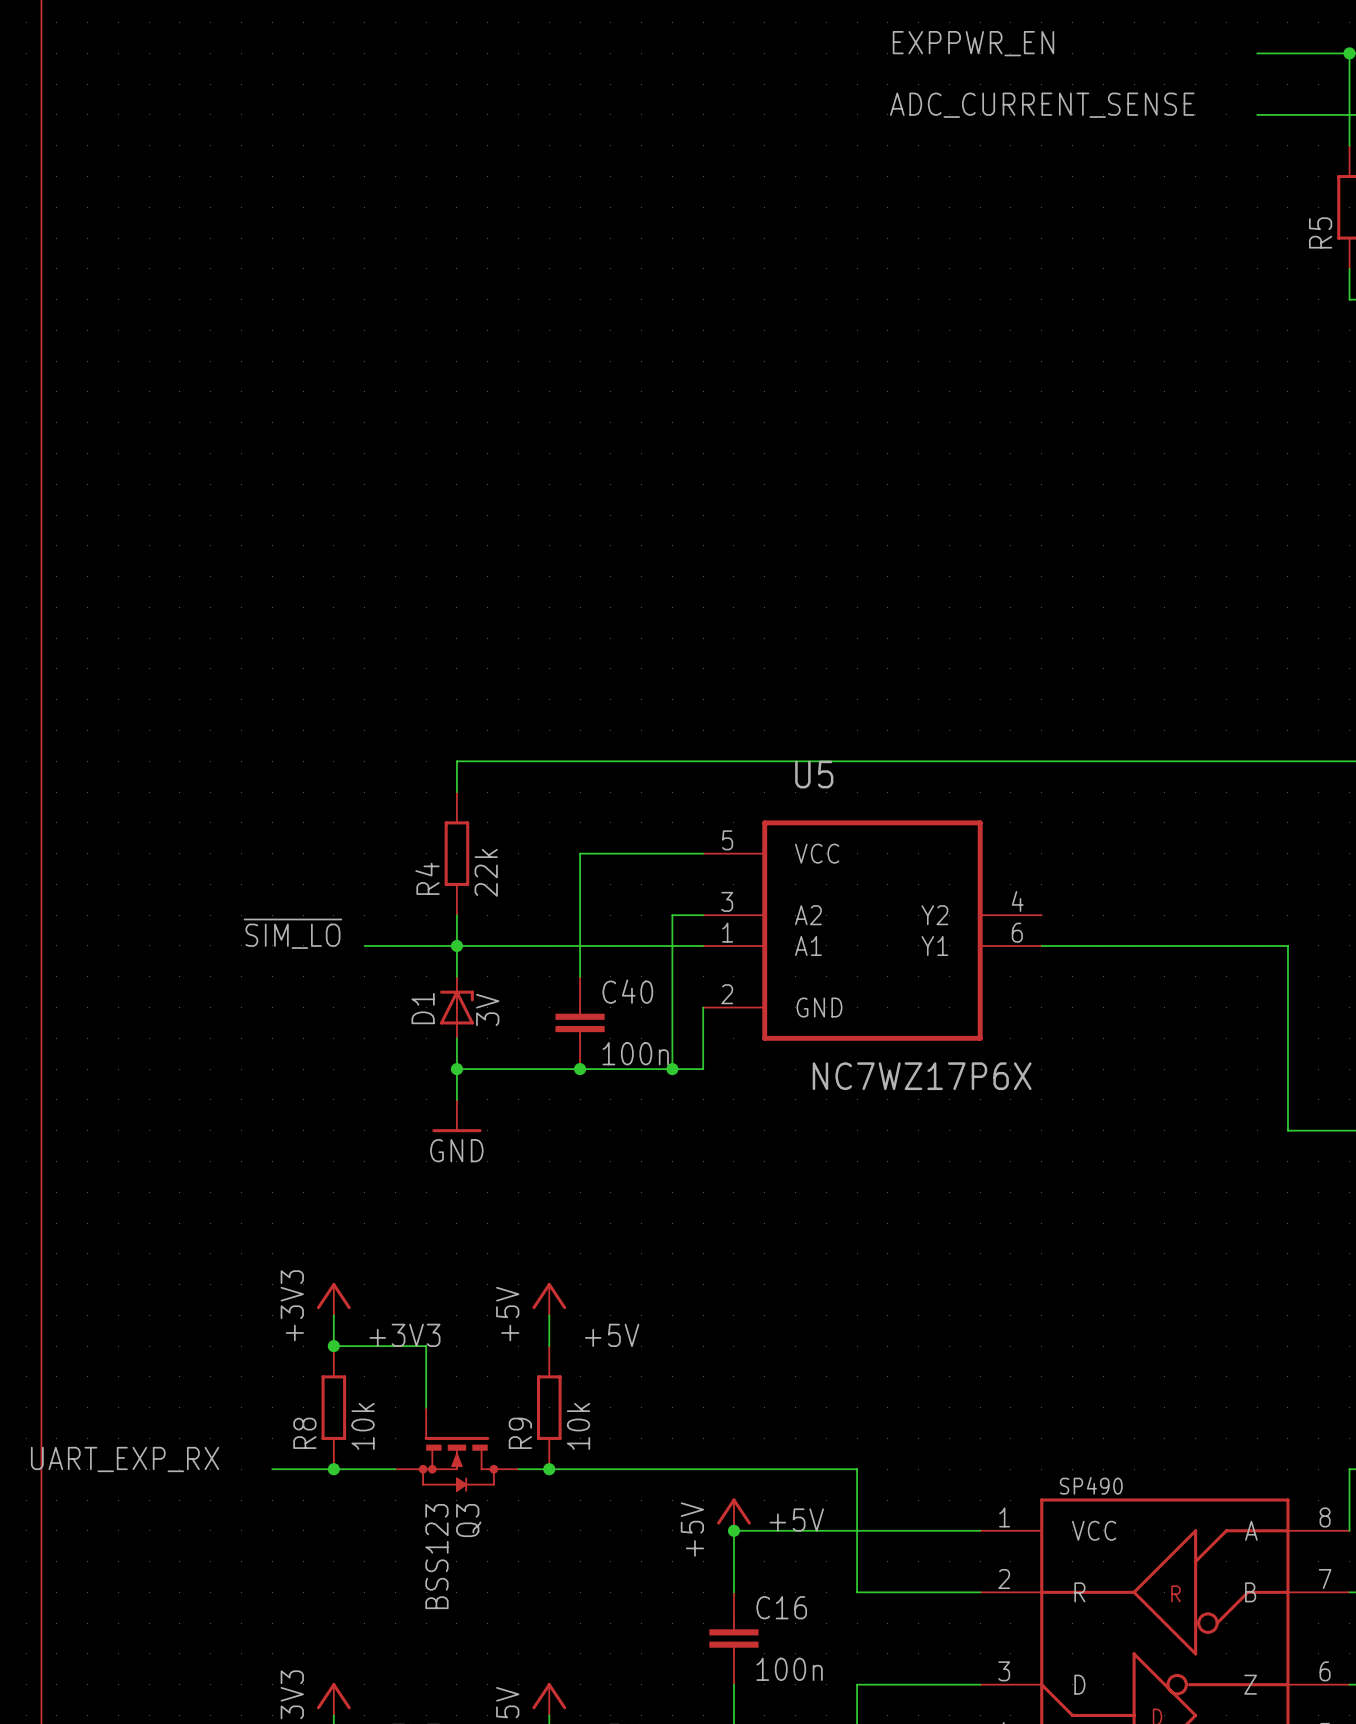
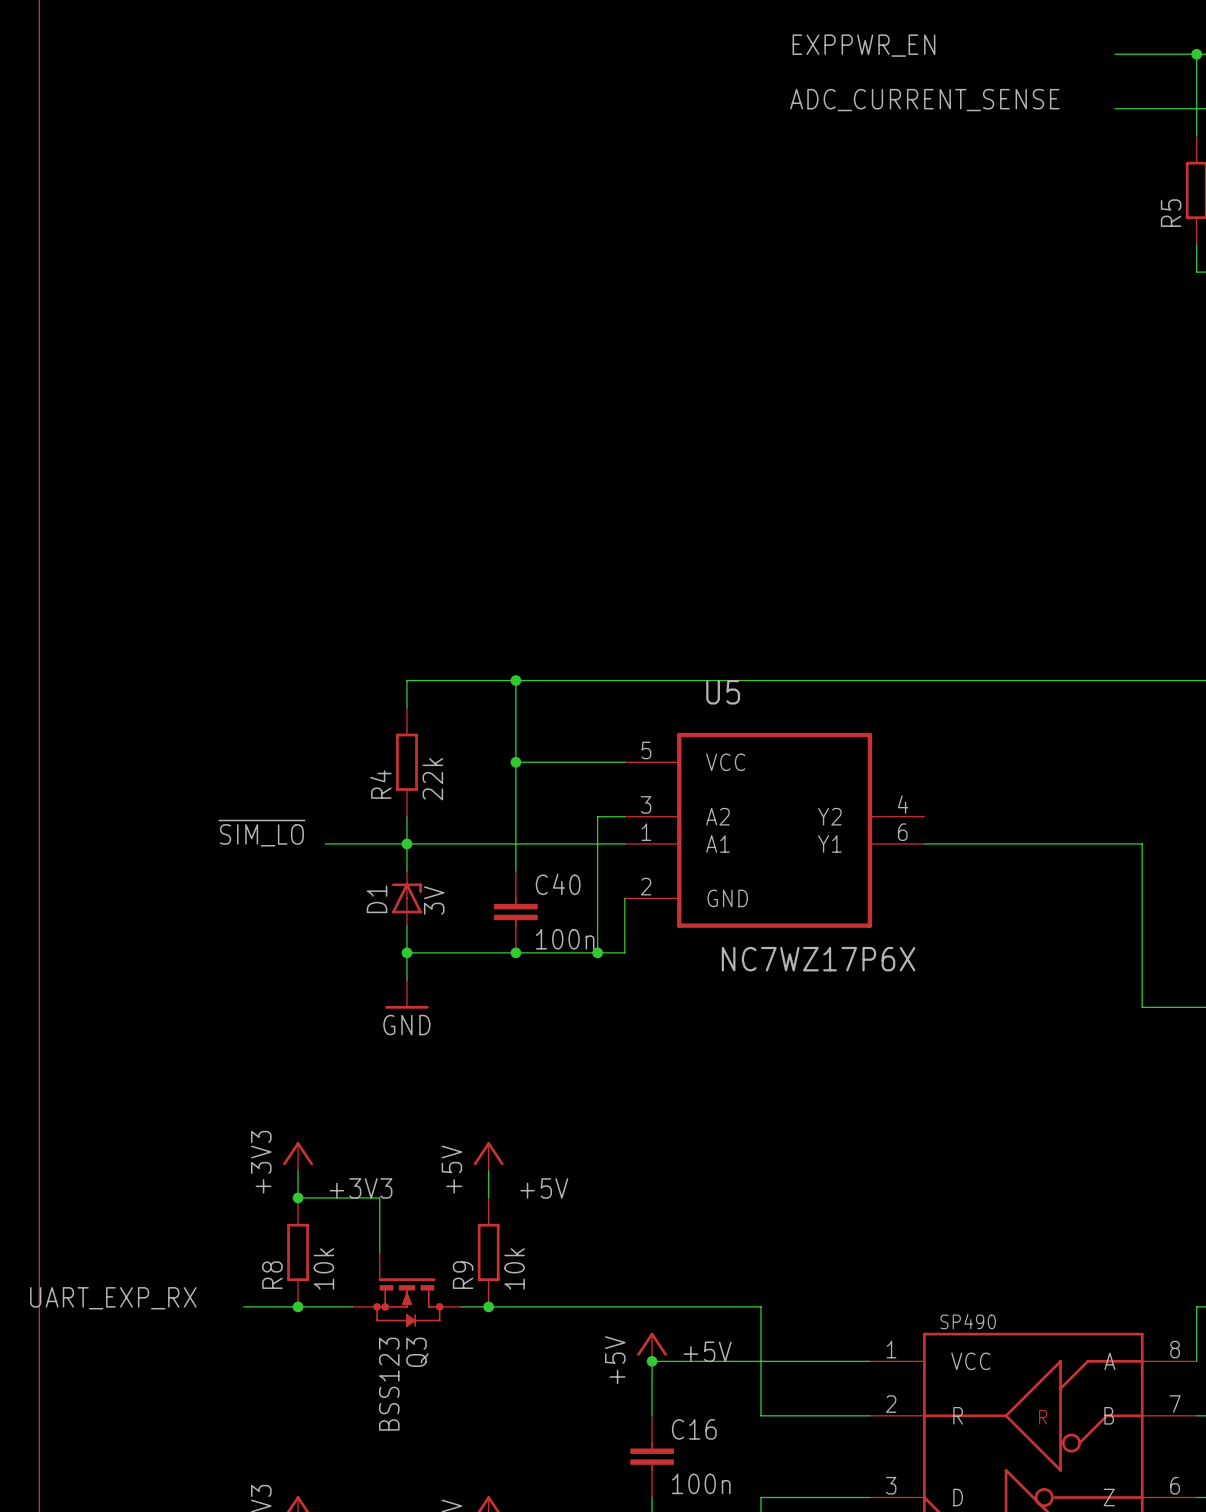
wire: none -> (515, 680) (515, 762)
junction: none -> (515, 680)
junction: none -> (515, 762)

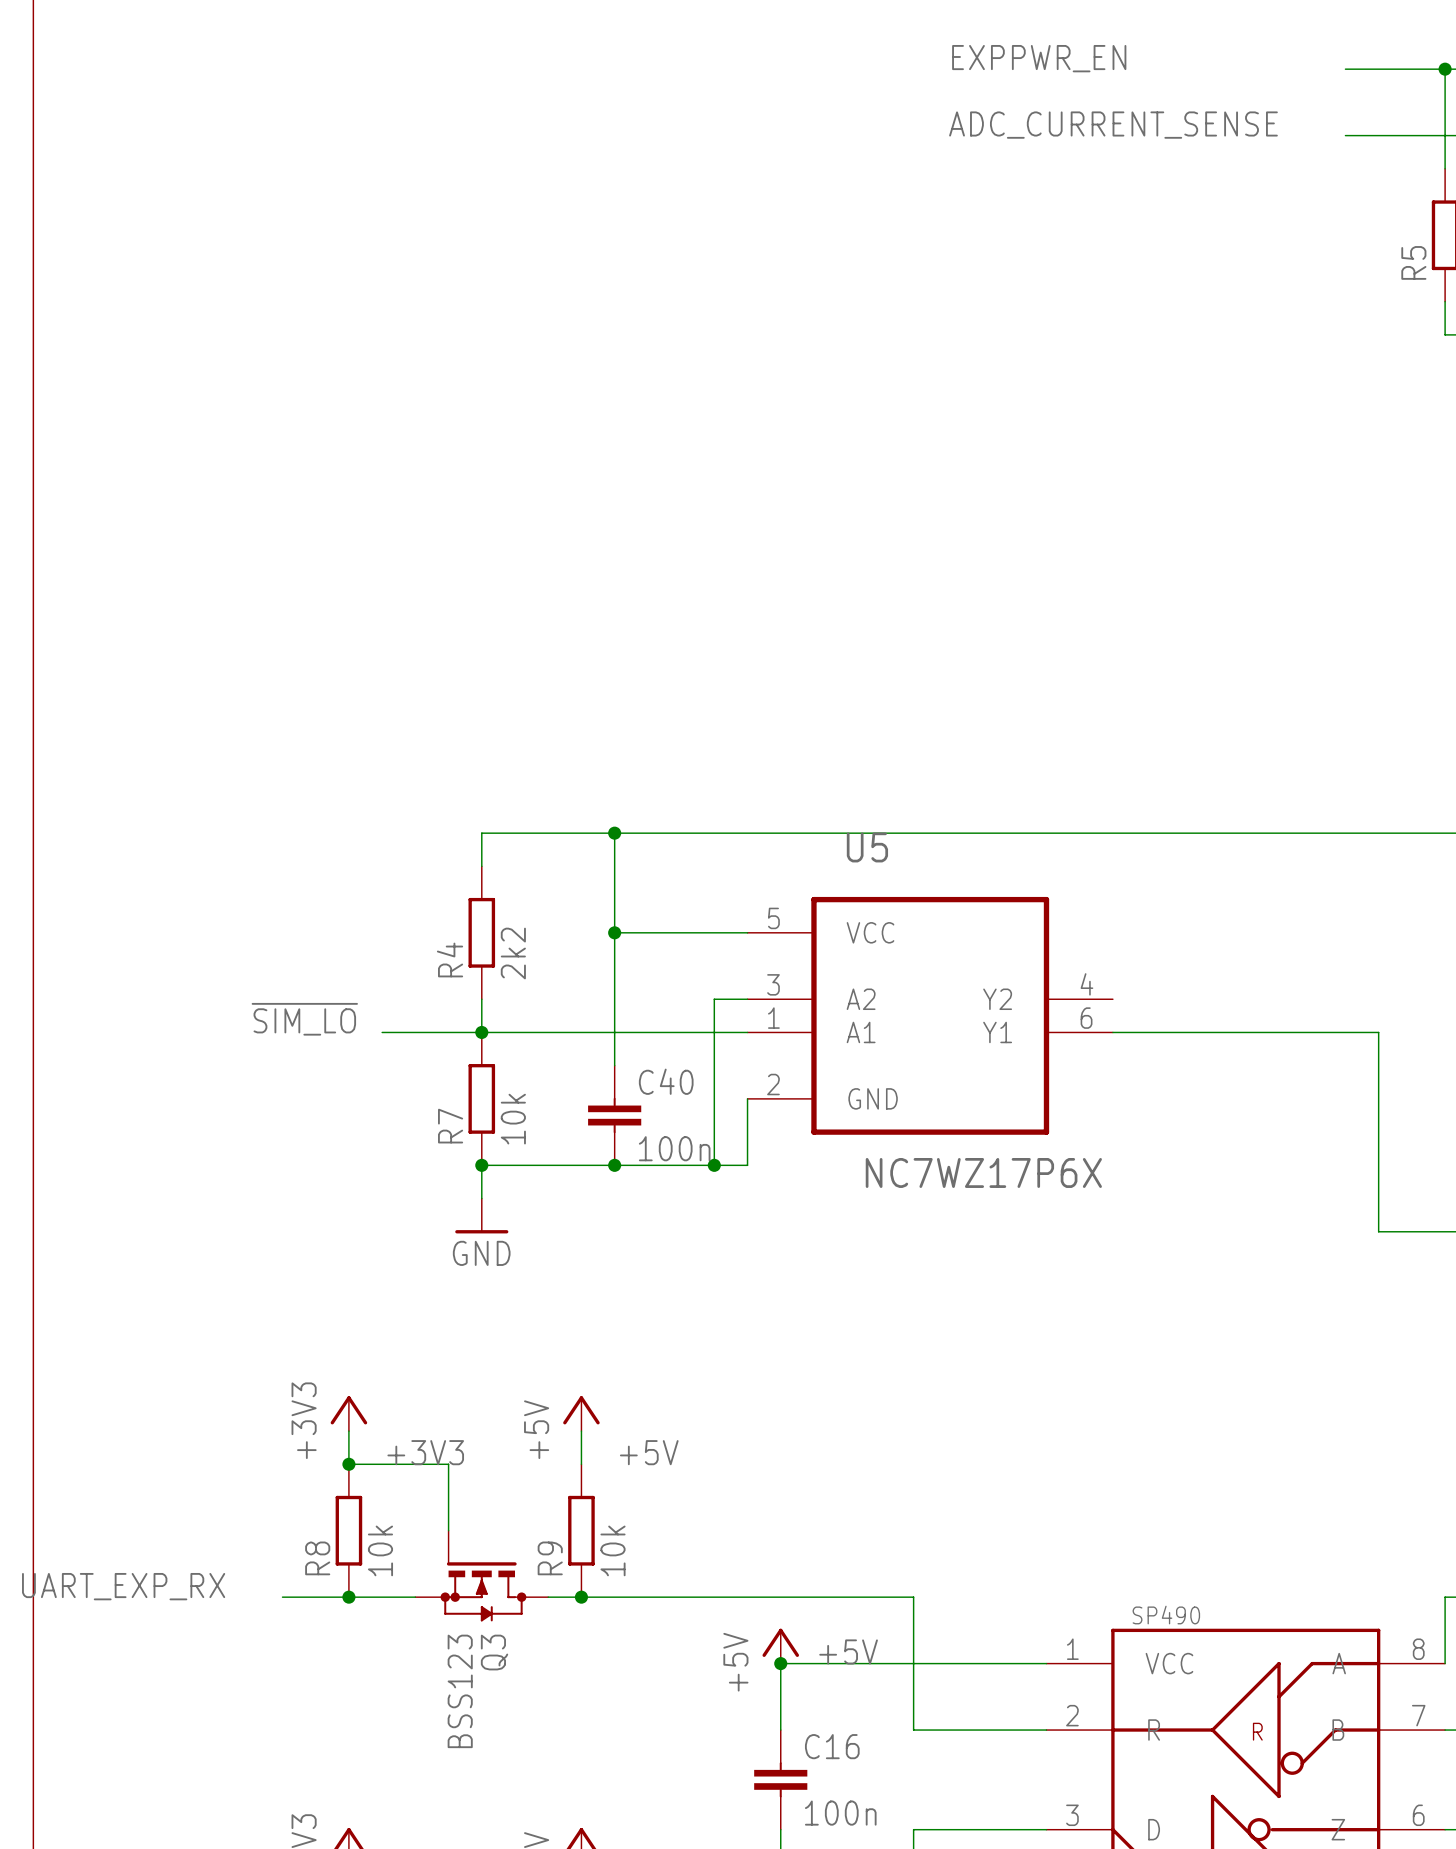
R4 value: 22k (432, 779) -> 2k2 (513, 953)
D1: 3V (406, 898) -> none
R7: none -> 10k (481, 1098)

